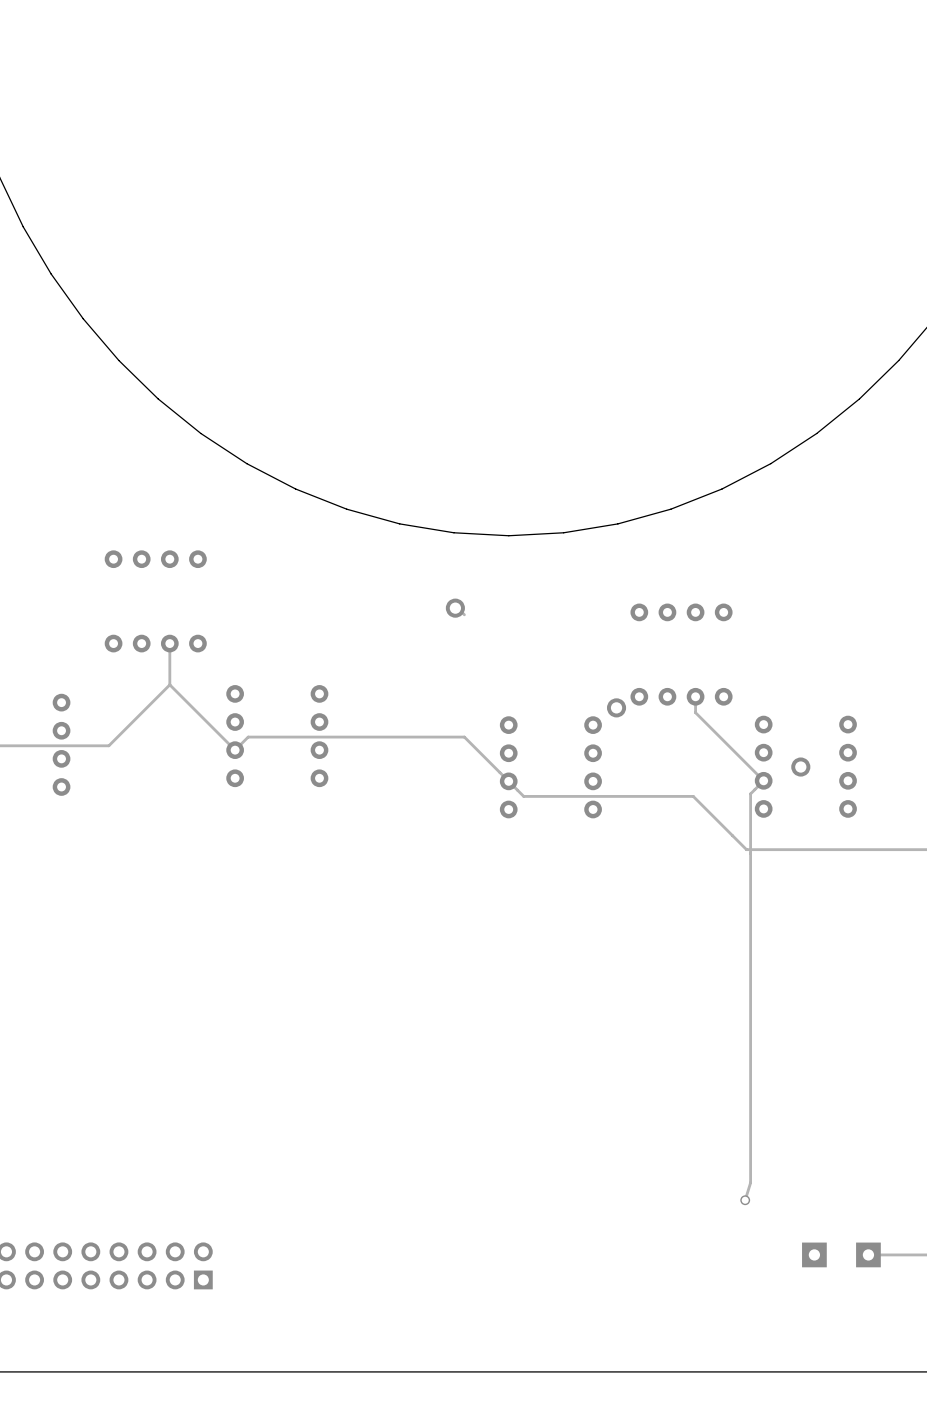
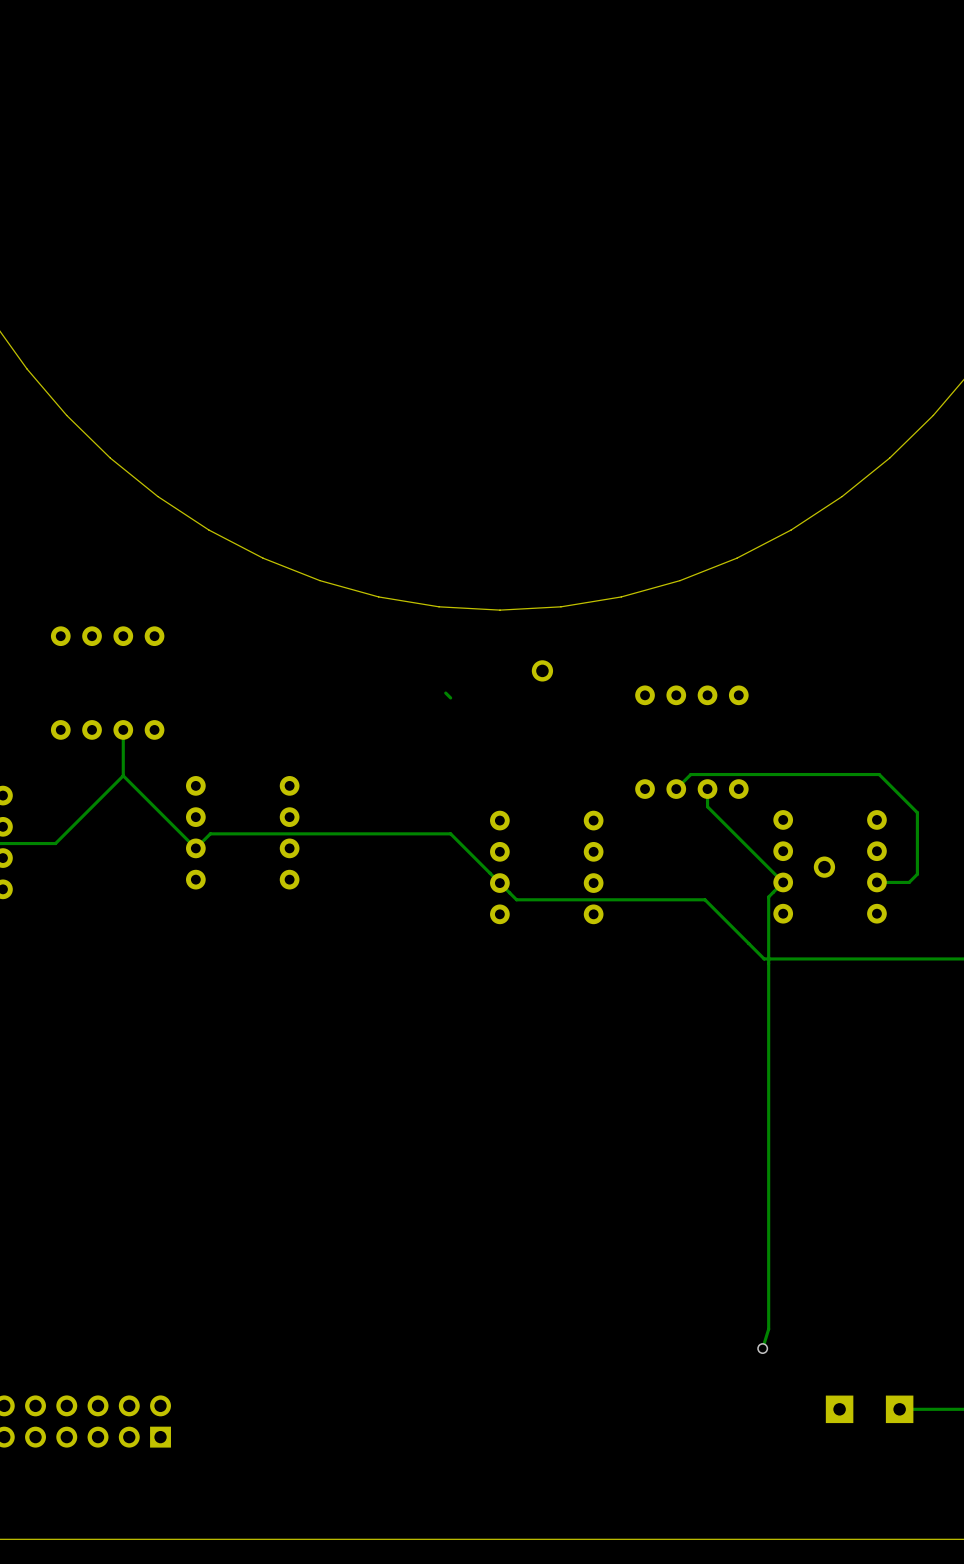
part: none -> (542, 670)
part: (455, 608) -> none
track: none -> (676, 789) (690, 774) (879, 774) (917, 812) (917, 874) (909, 882) (876, 882)
part: (616, 707) -> none

